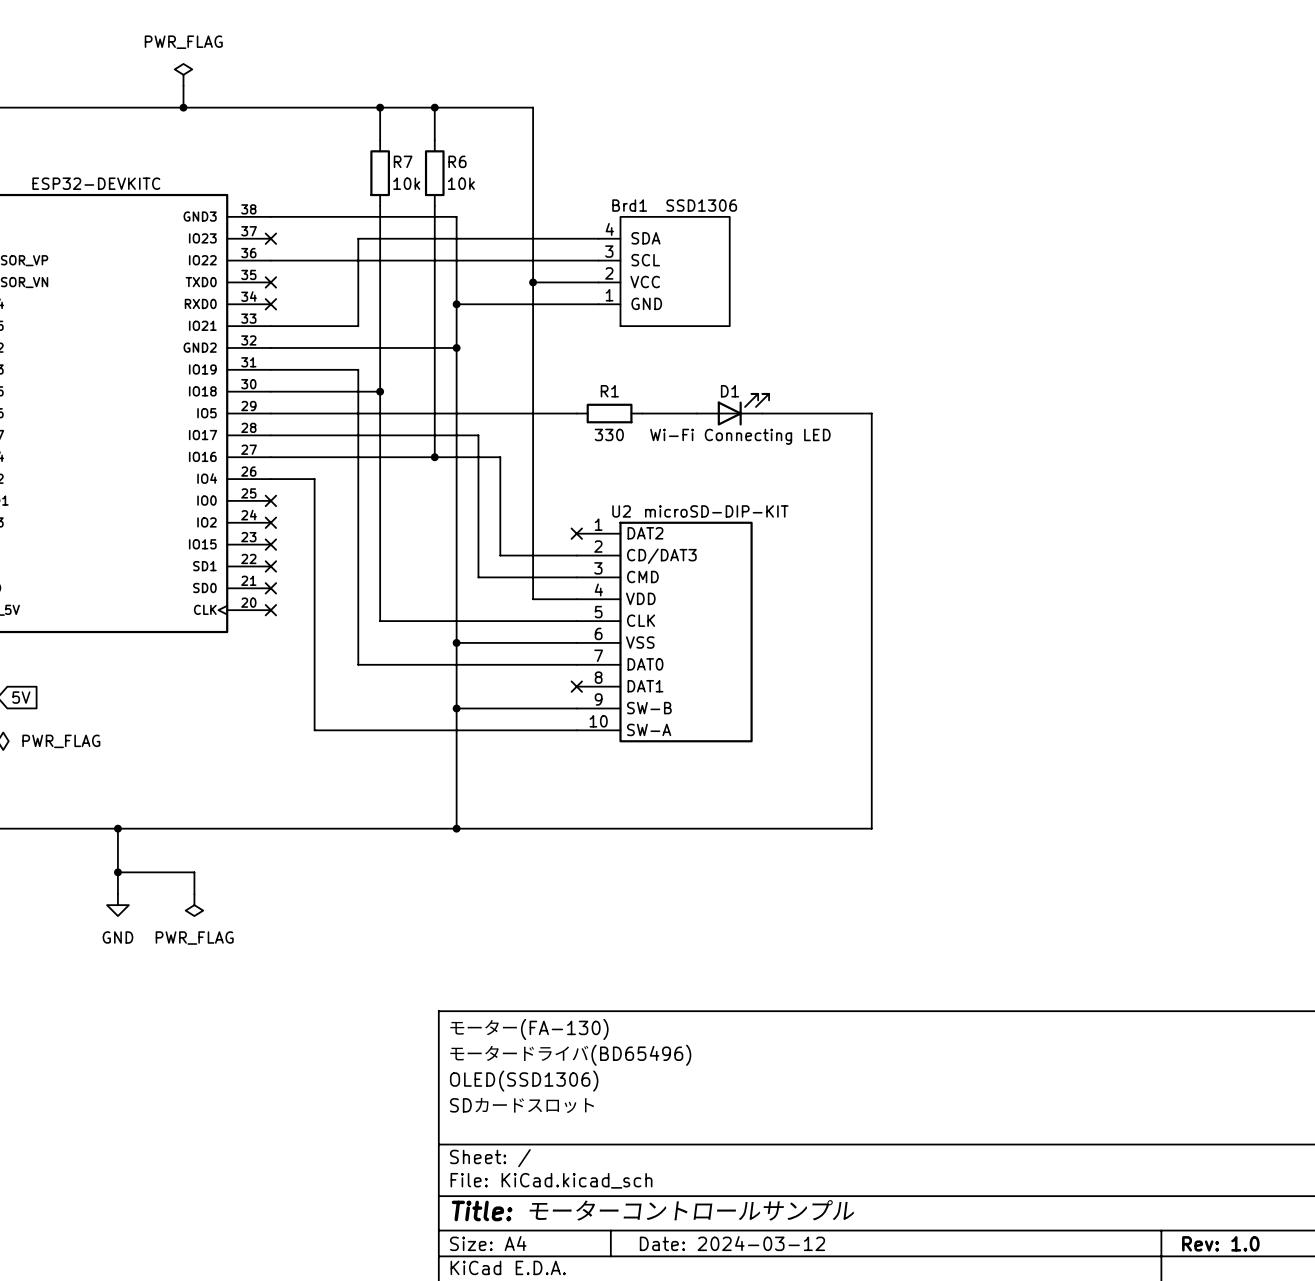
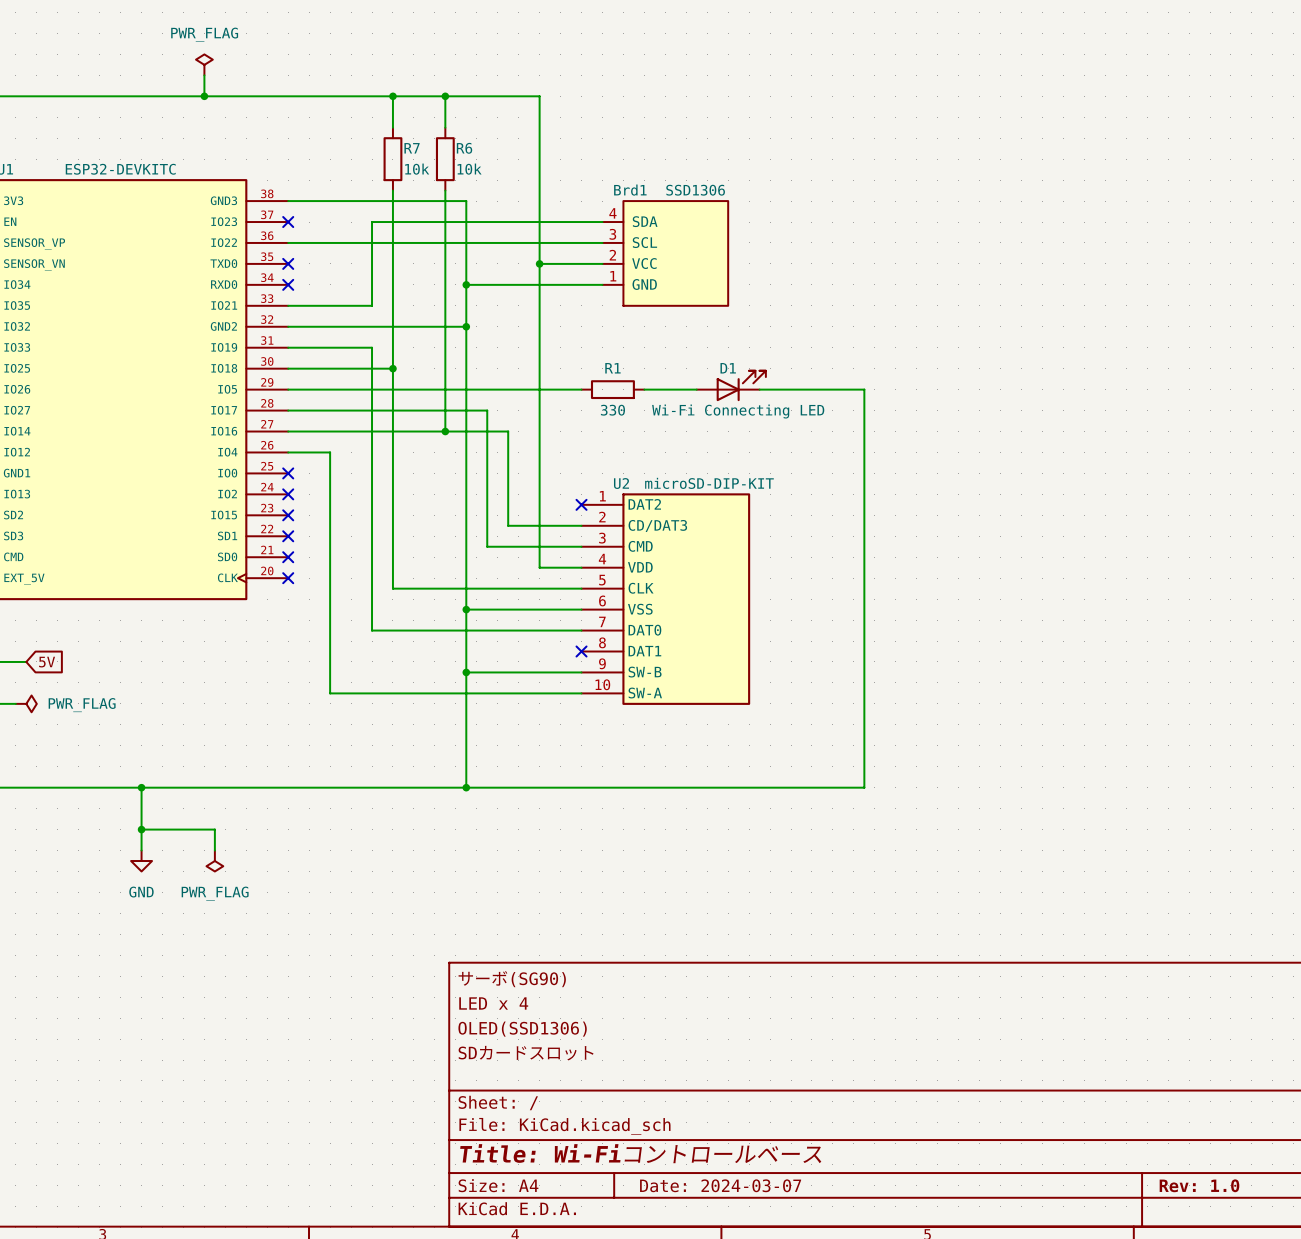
title block: モーター(FA-130) (529, 1029) -> サーボ(SG90) (512, 979)
title block: モータードライバ(BD65496) (570, 1055) -> LED x 4 (493, 1003)
title block: Title: モーターコントロールサンプル (653, 1210) -> Title: Wi-Fiコントロールベース (640, 1153)
title block: Date: 2024-03-12 (732, 1243) -> Date: 2024-03-07 (720, 1185)

